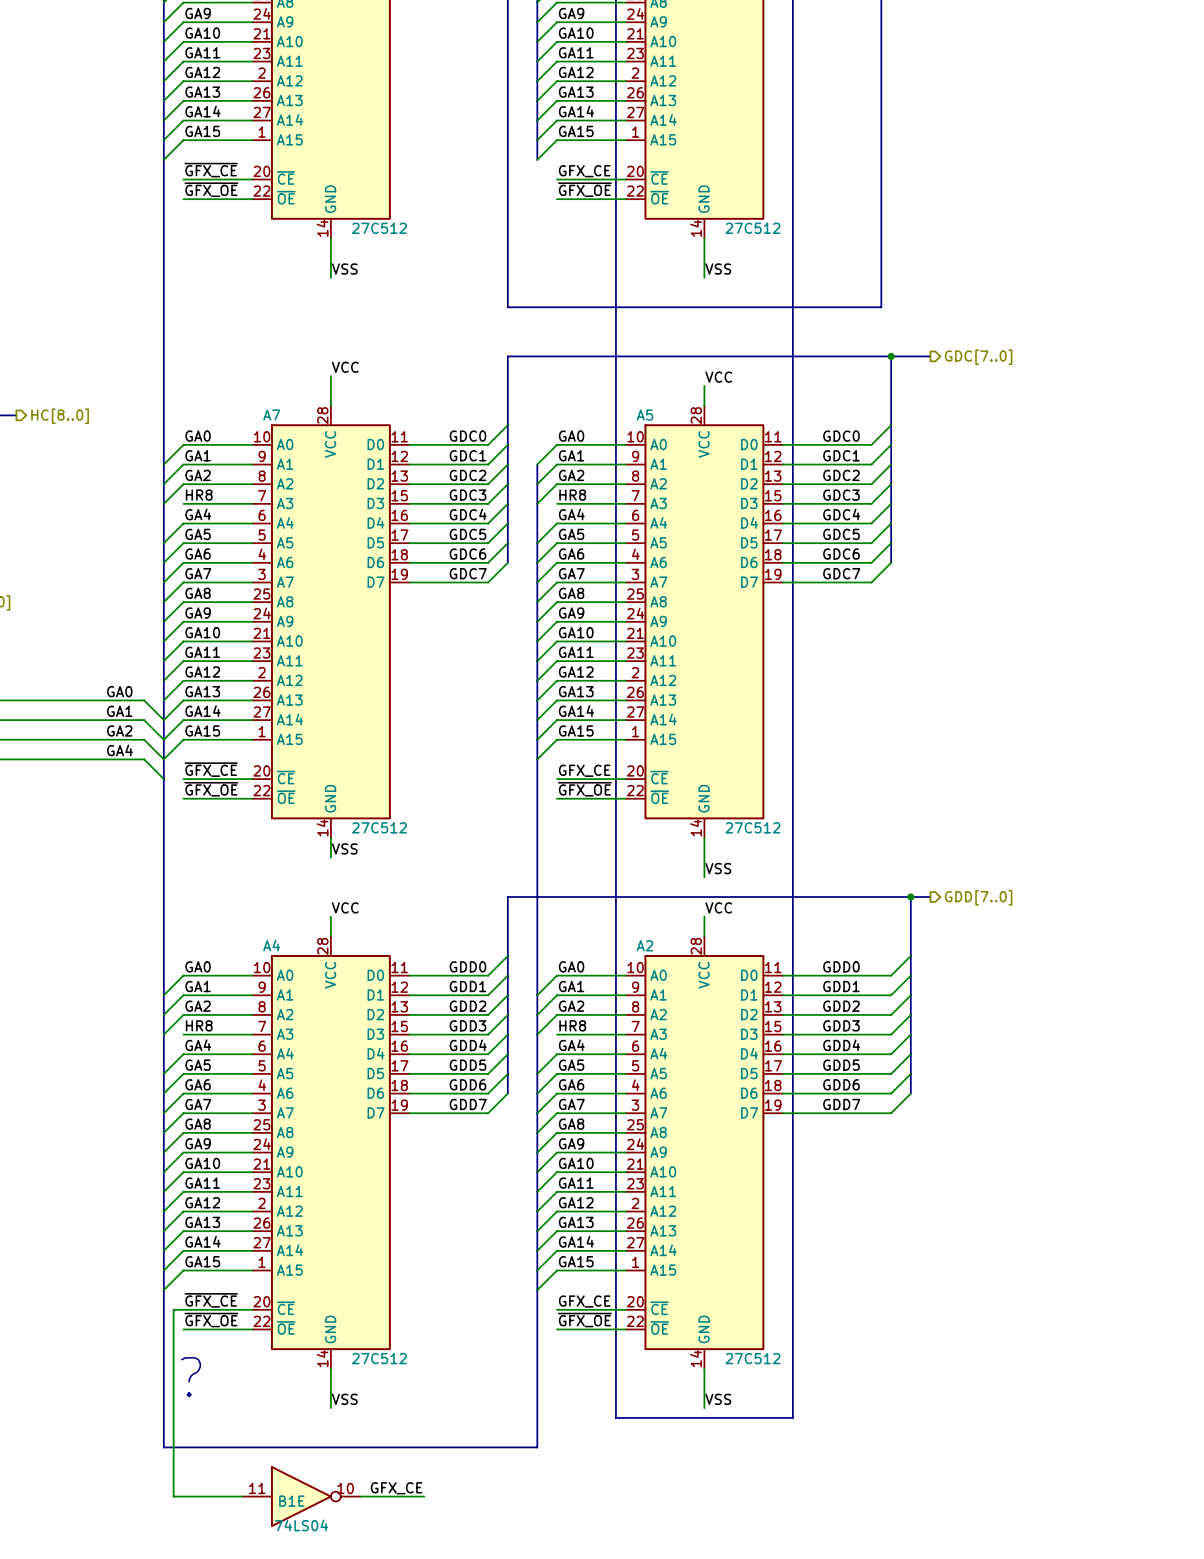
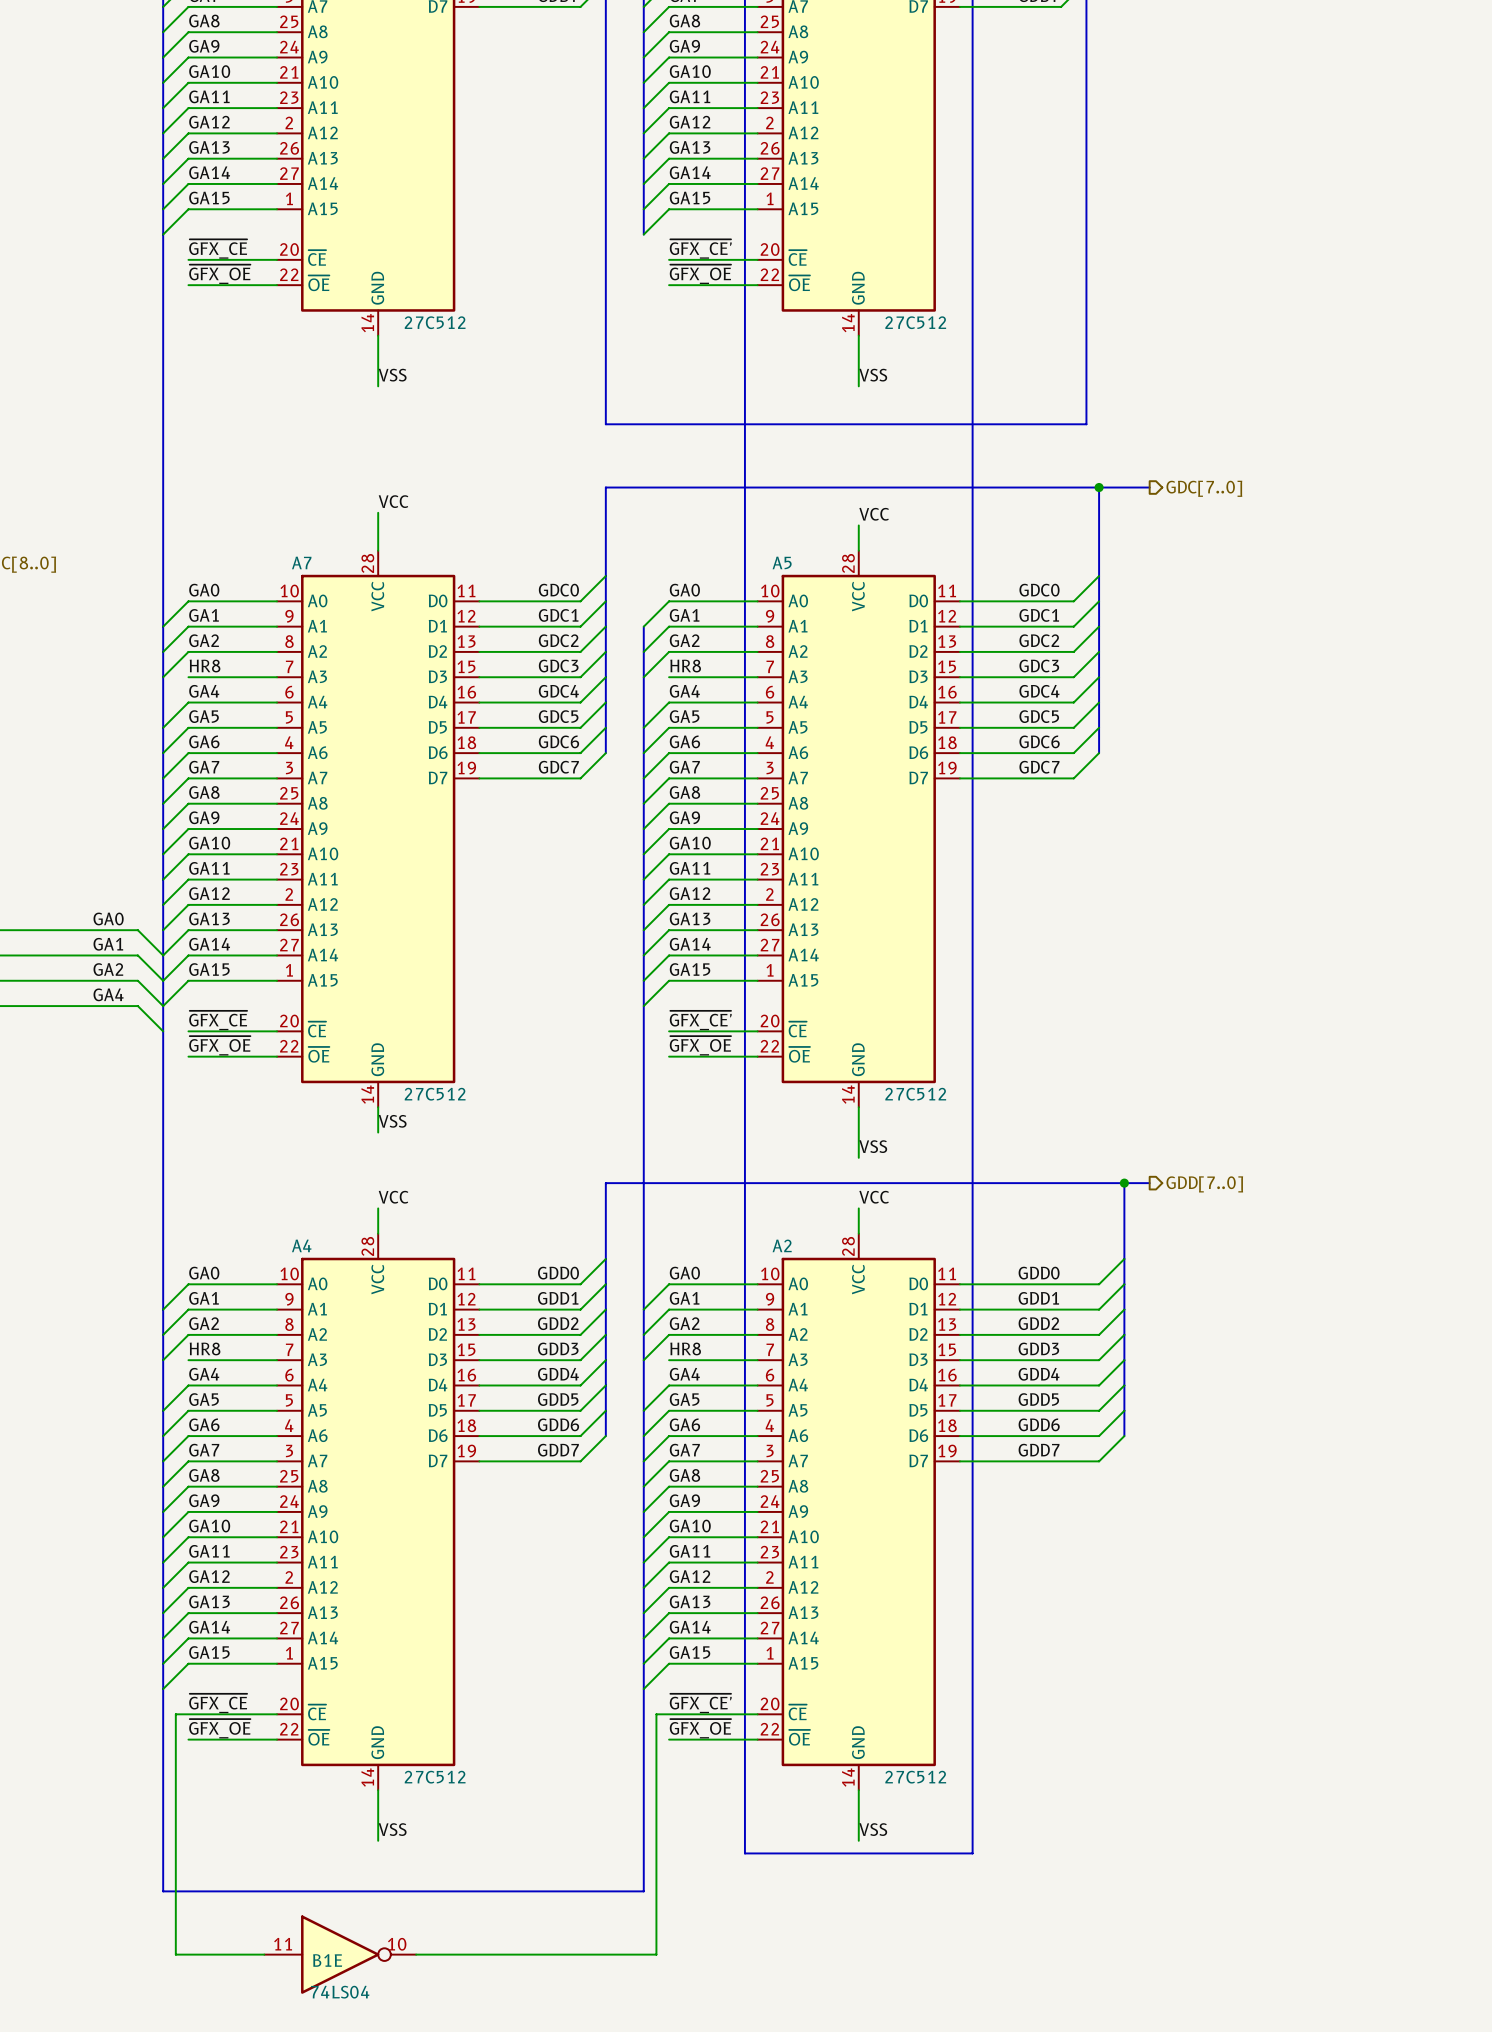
label: GFX_CE (584, 171) -> ~{GFX_CE'} (700, 249)
label: GFX_CE (584, 770) -> ~{GFX_CE'} (700, 1020)
label: GFX_CE (584, 1301) -> ~{GFX_CE'} (700, 1703)
wire: none -> (669, 1714) (656, 1714) (656, 1954) (498, 1954)
text: ? (191, 1377) -> none
label: GFX_CE (396, 1488) -> none

